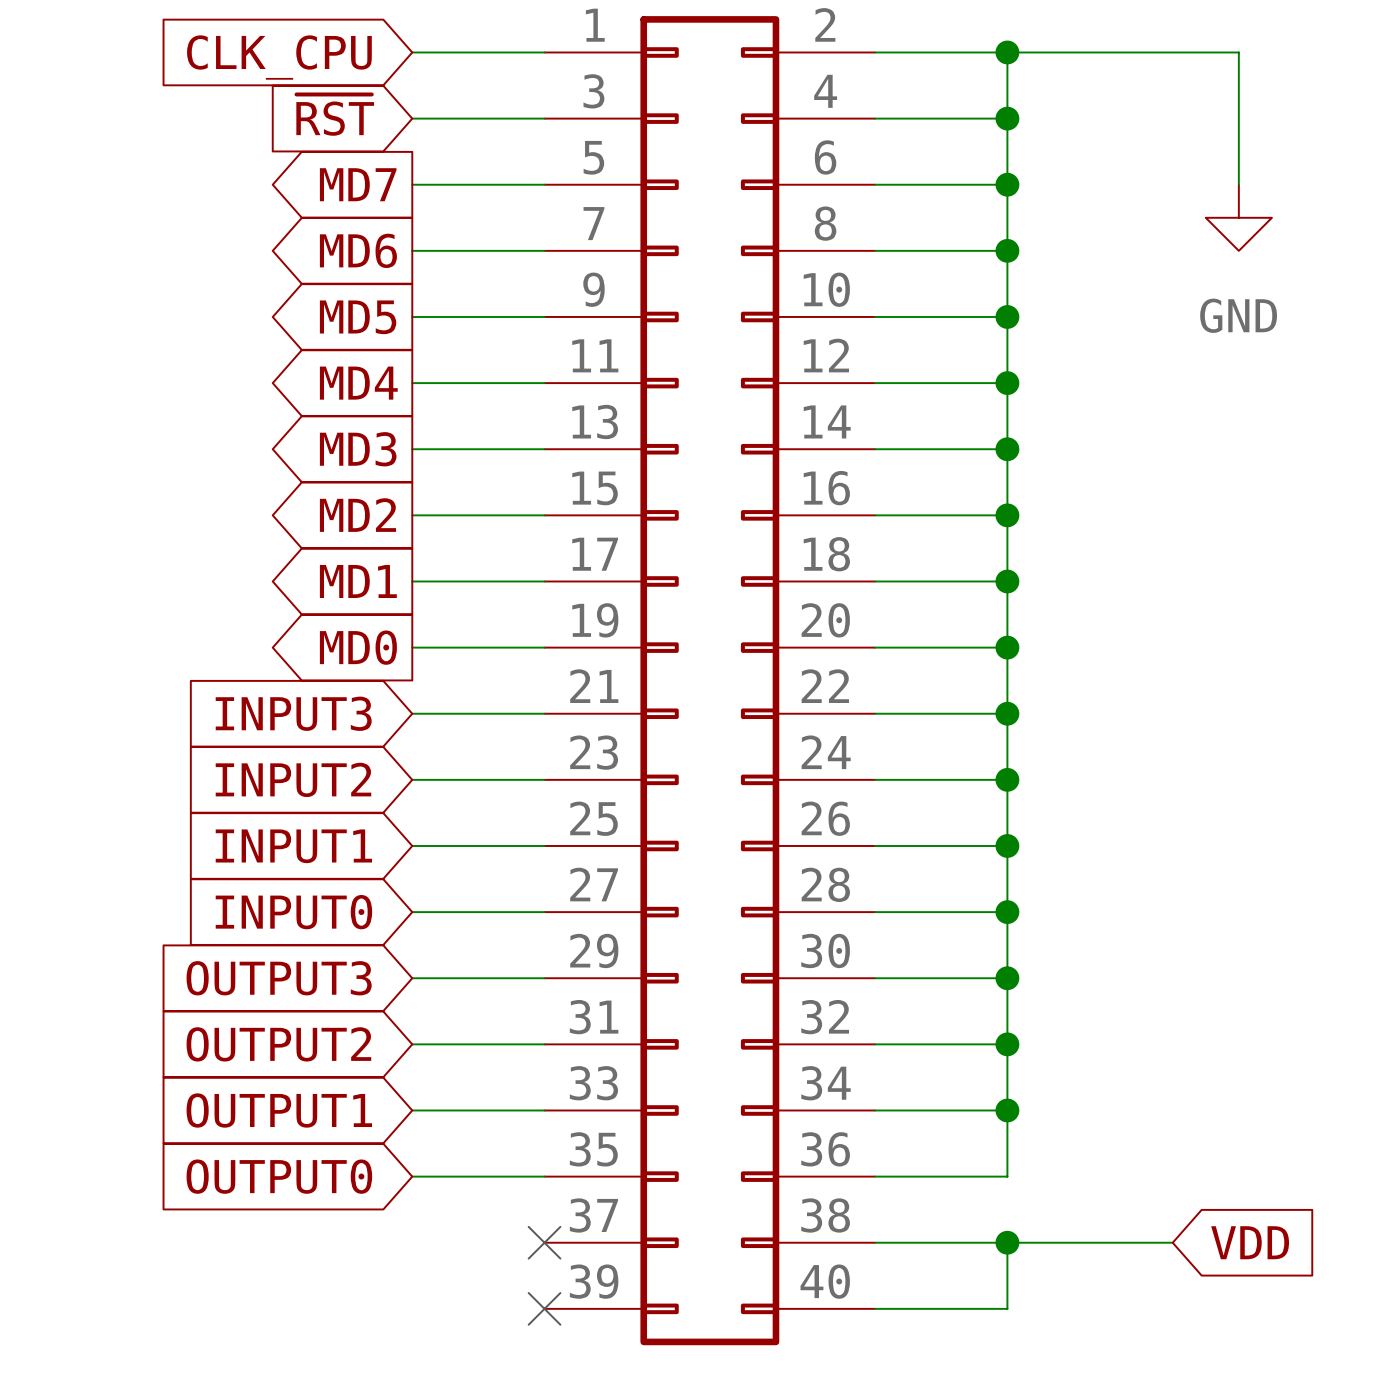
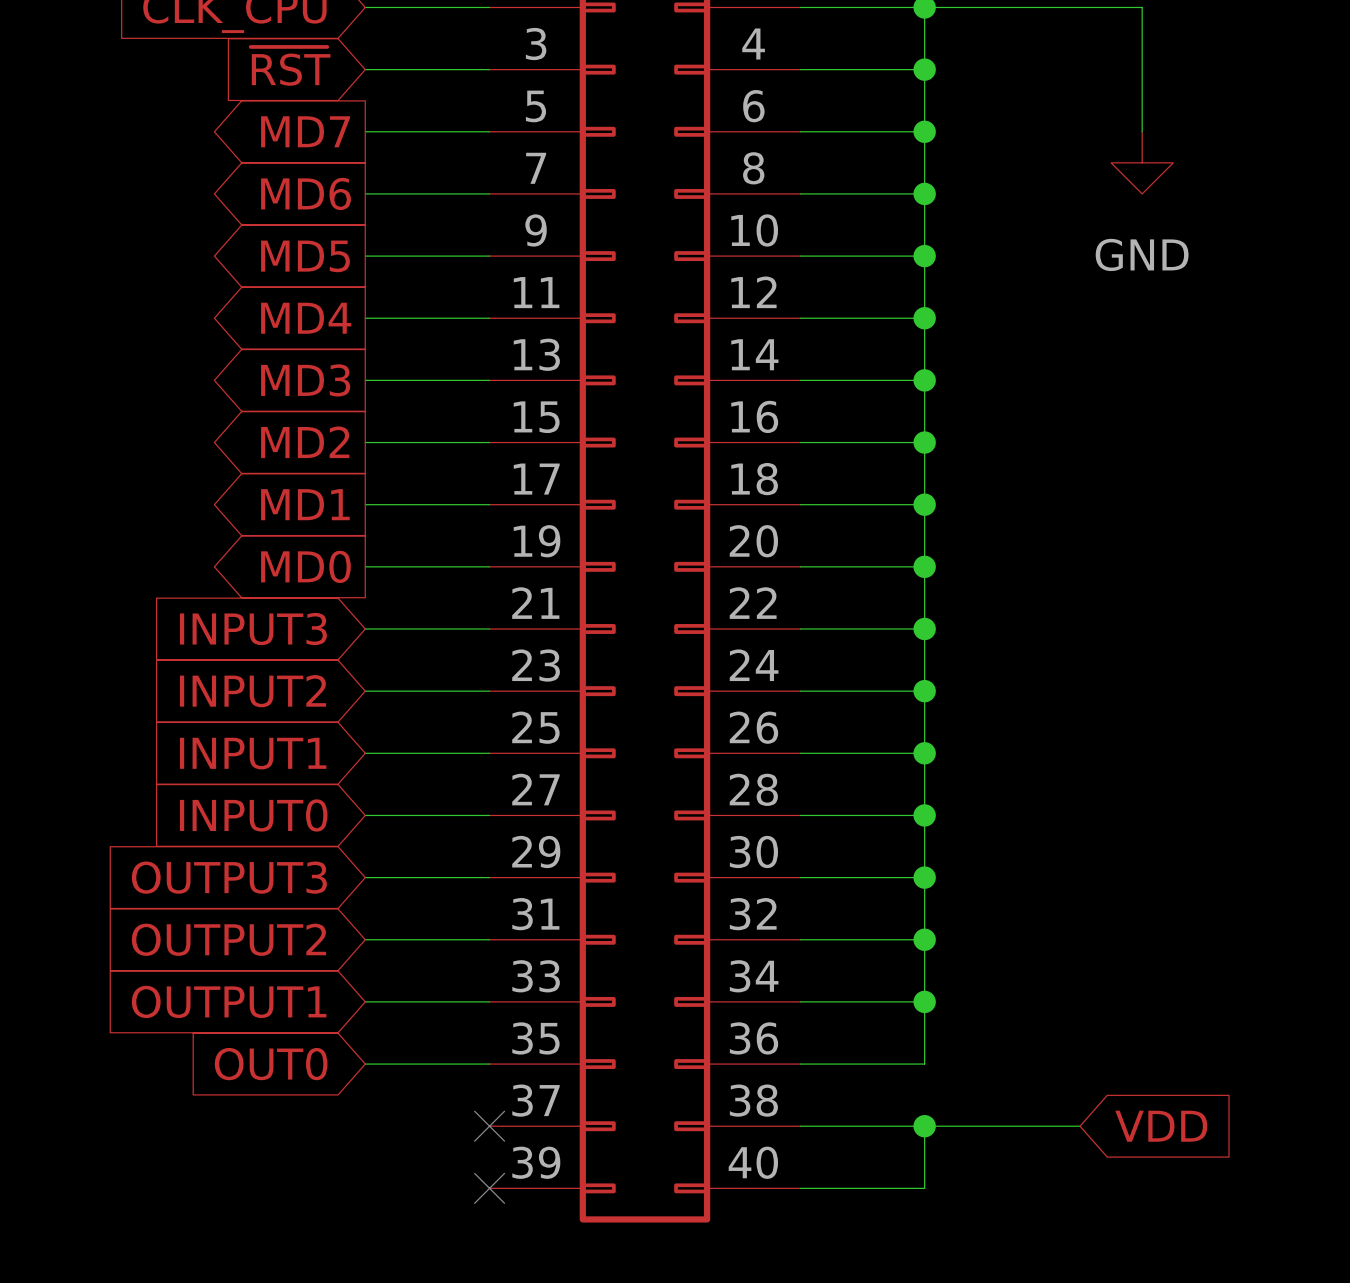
global label: OUTPUT0 (279, 1176) -> OUT0 (271, 1064)

